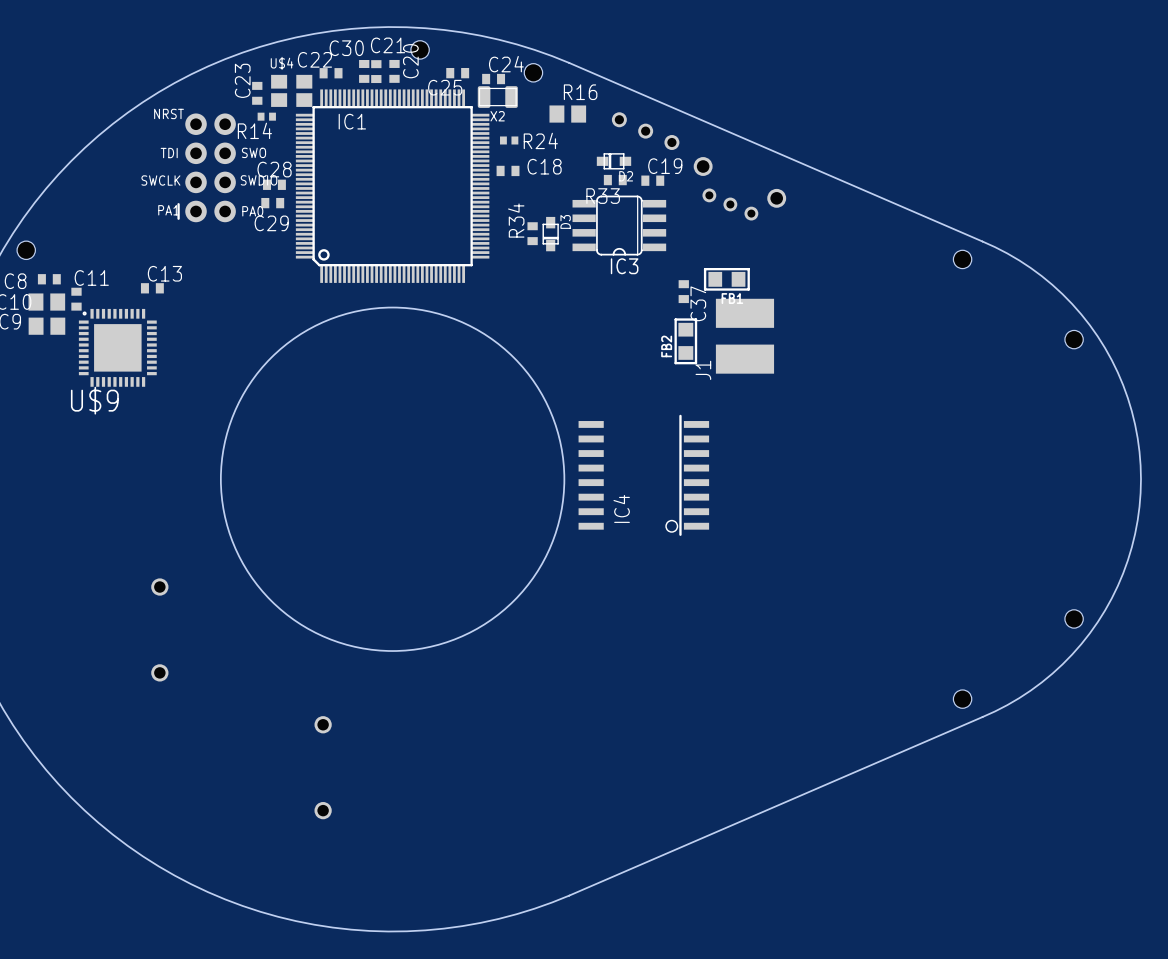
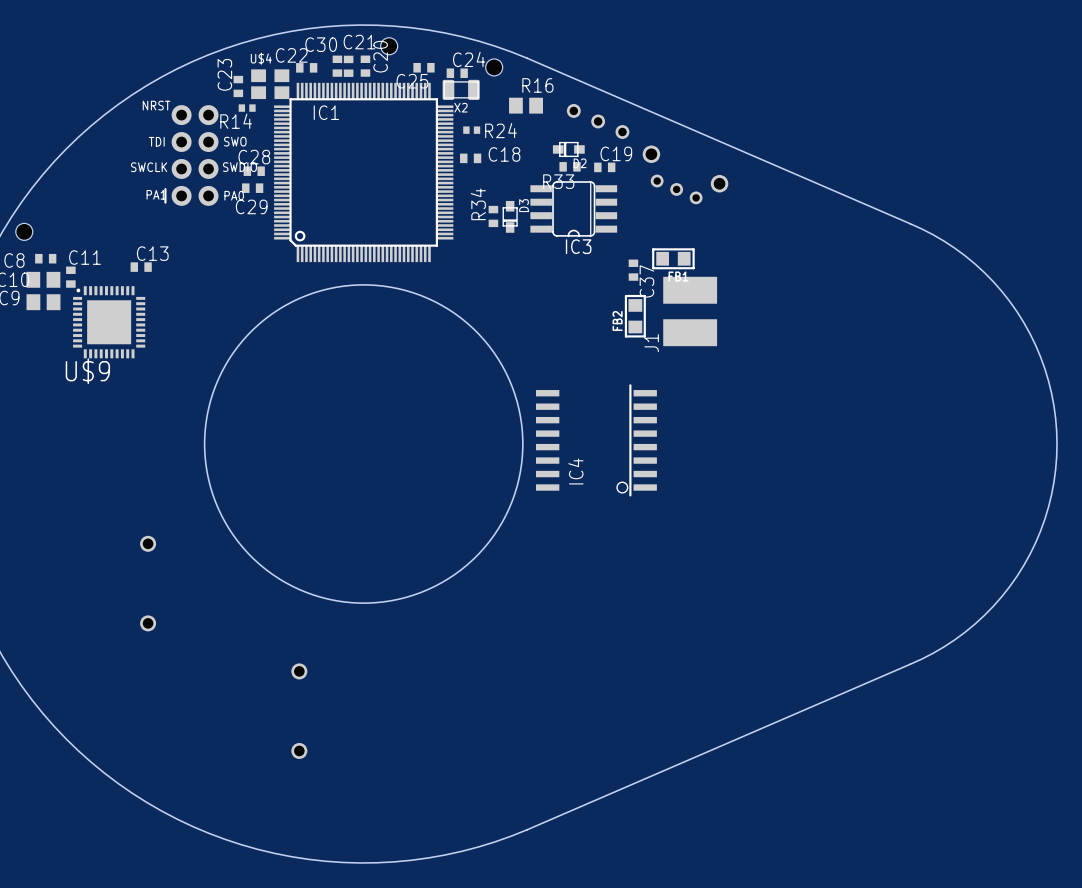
hole: (962, 259) -> none
hole: (1074, 339) -> none
hole: (1074, 618) -> none
hole: (962, 699) -> none

